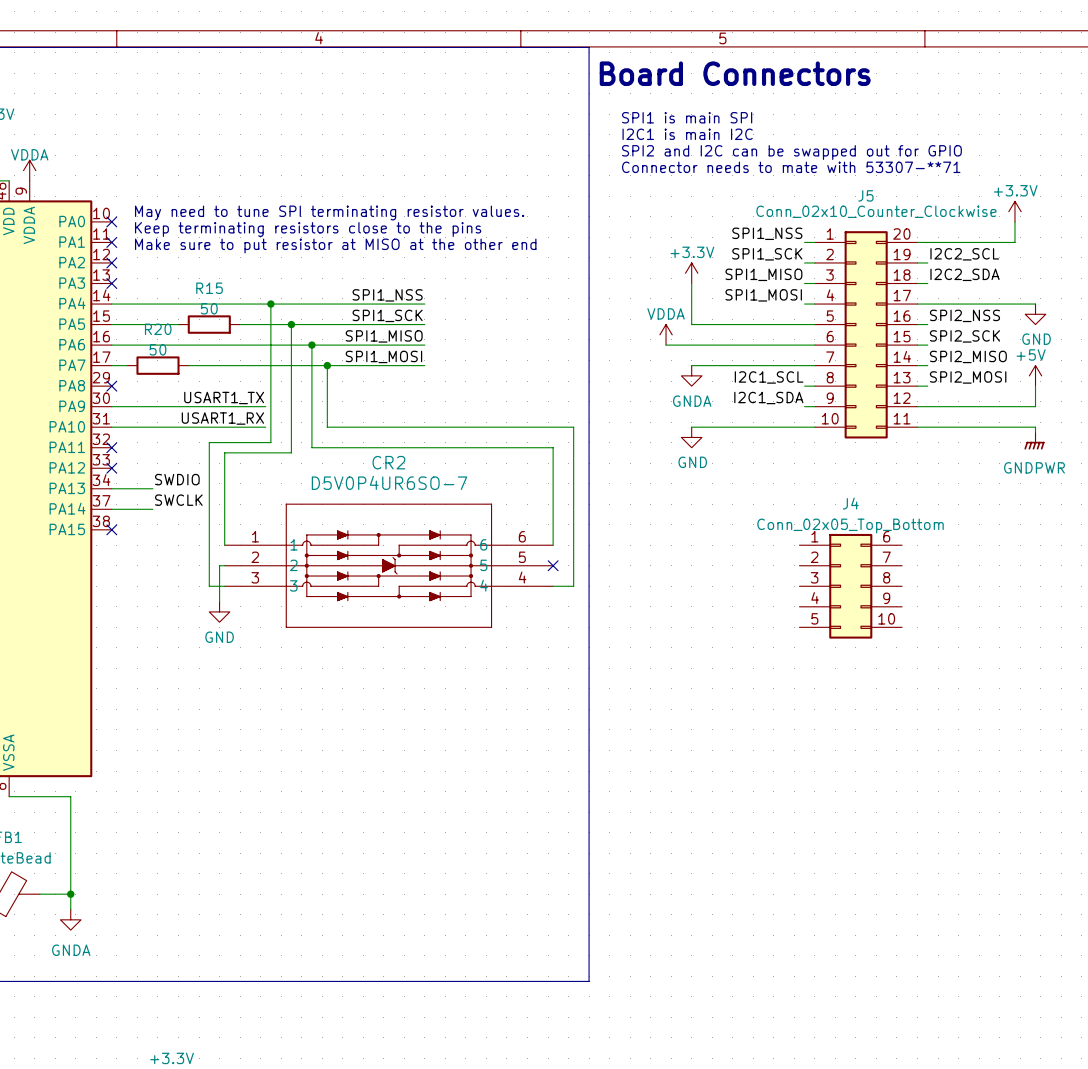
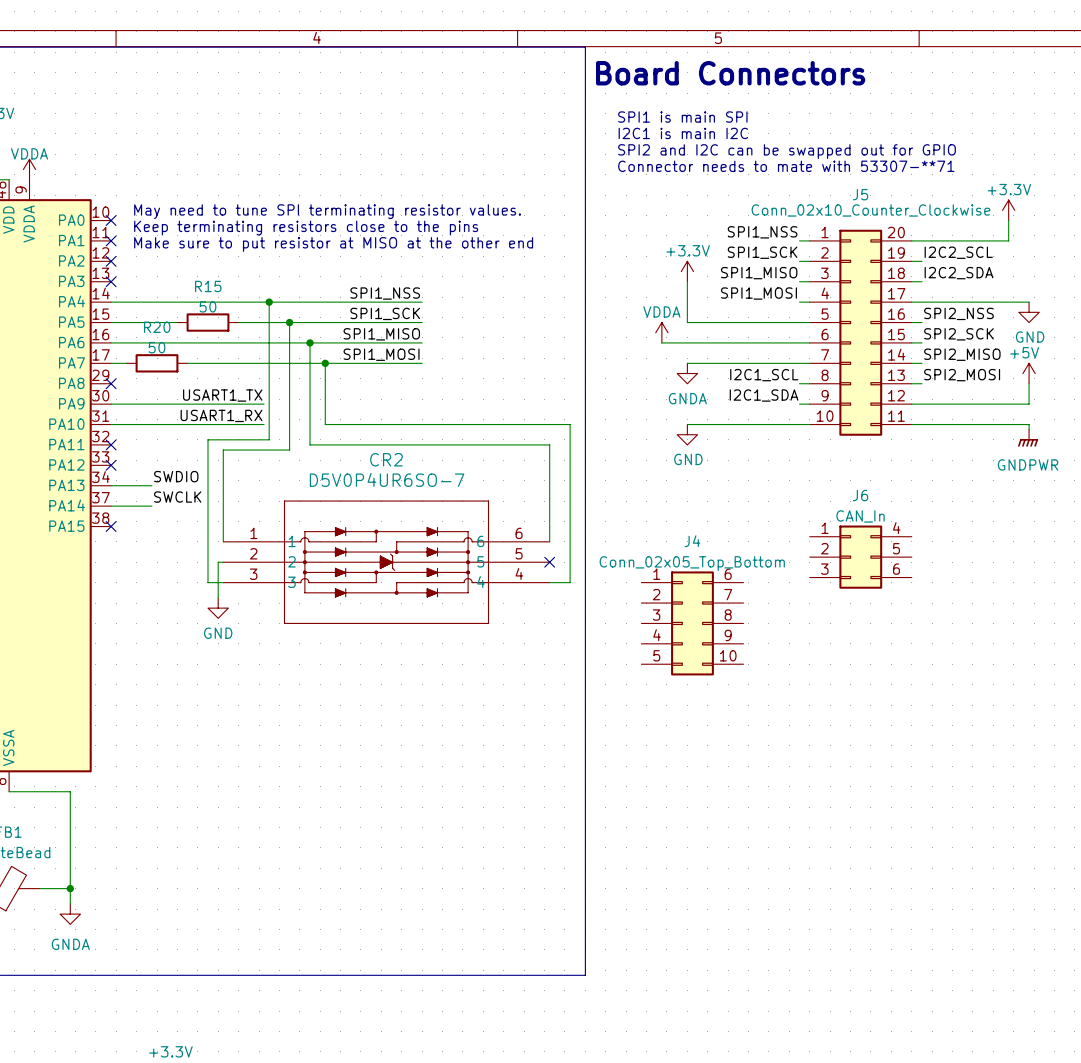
J6: none -> CAN_In (860, 557)
J4 position: (850, 586) -> (692, 623)

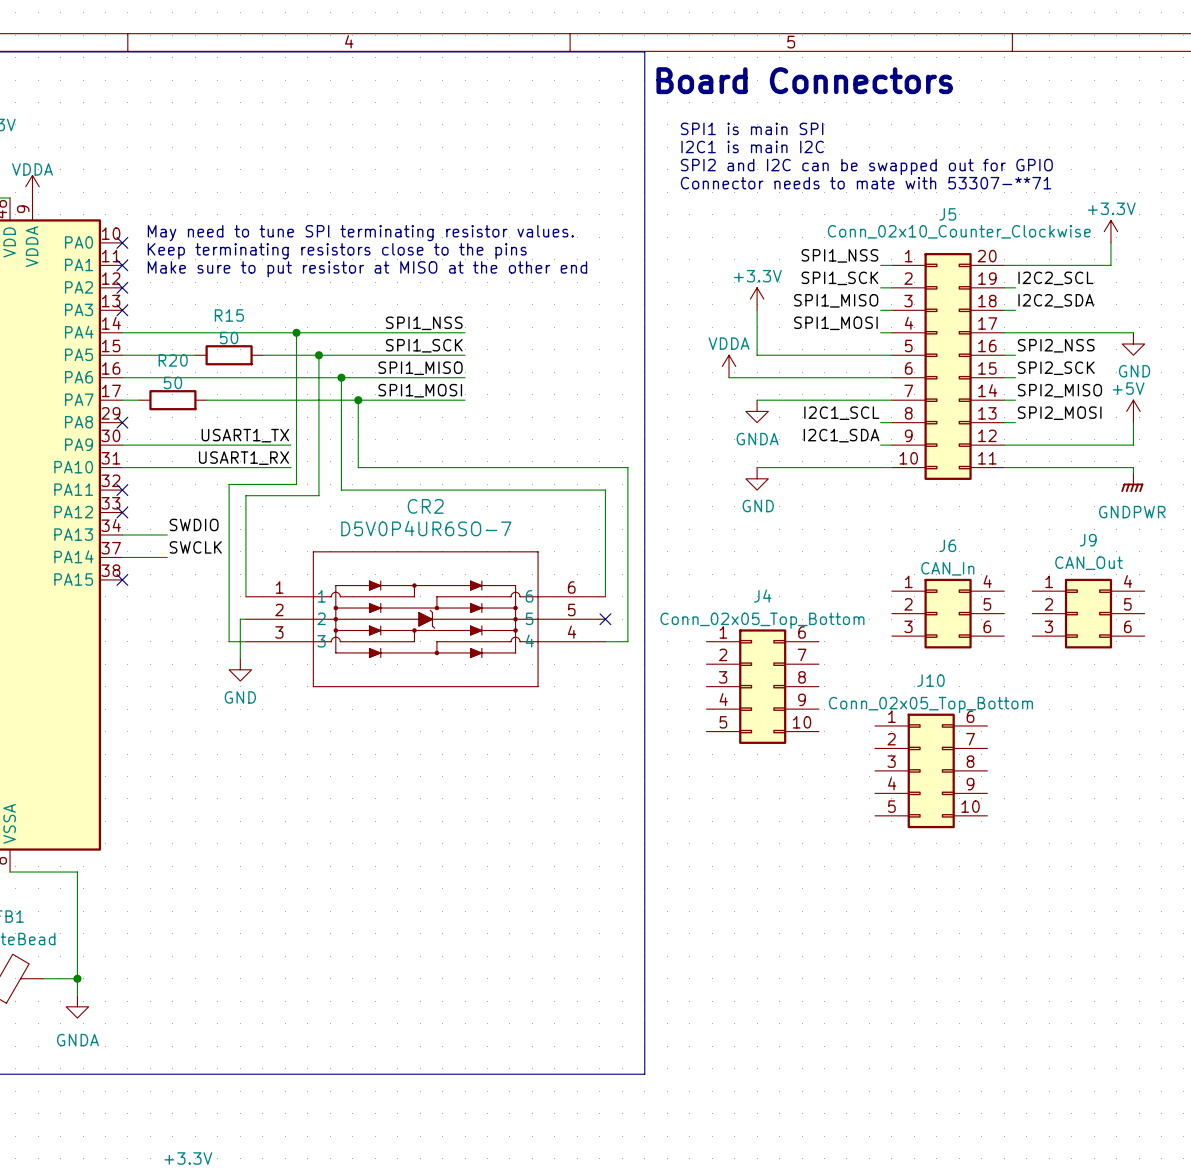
J9: none -> CAN_Out (1088, 613)
J10: none -> Conn_02x05_Top_Bottom (931, 770)

